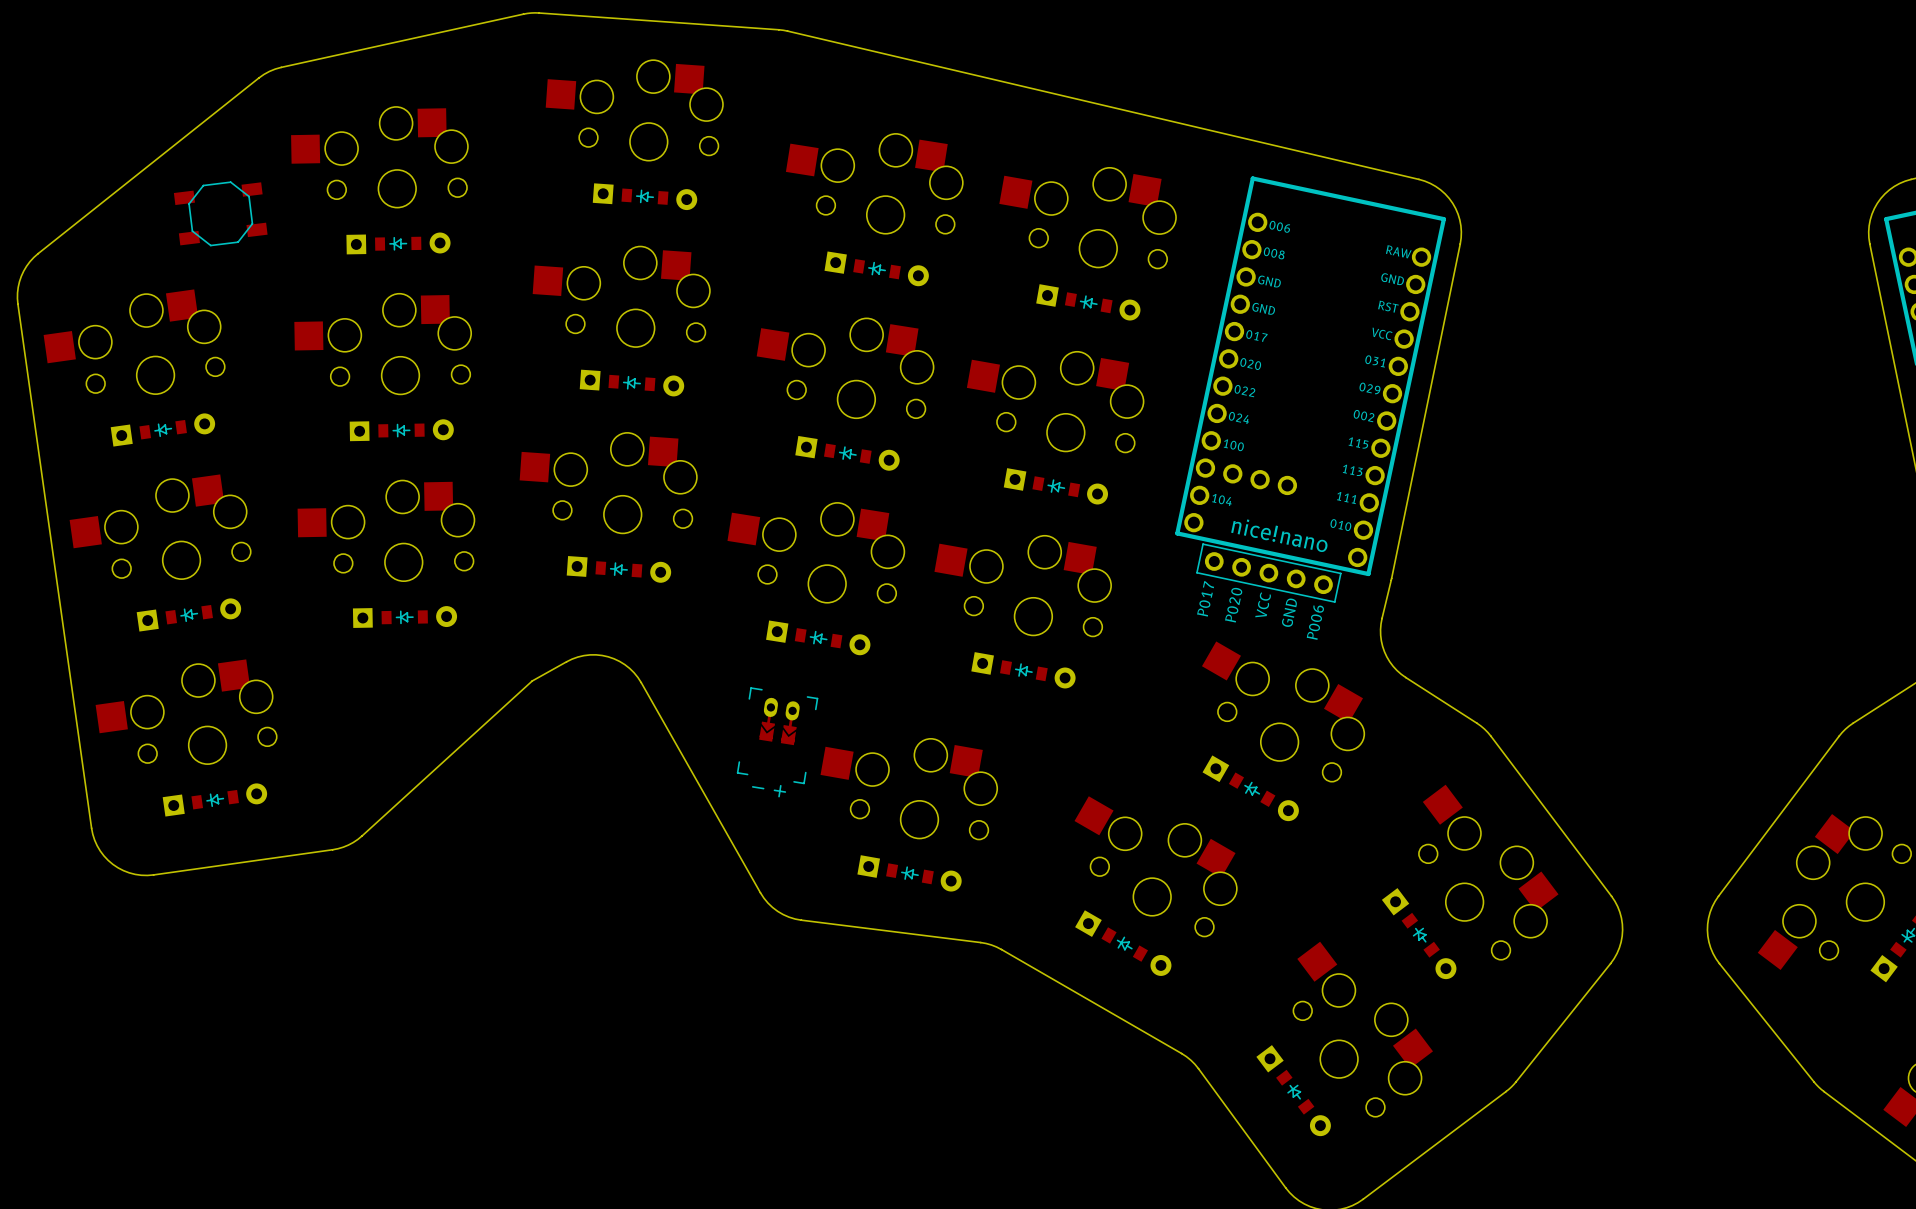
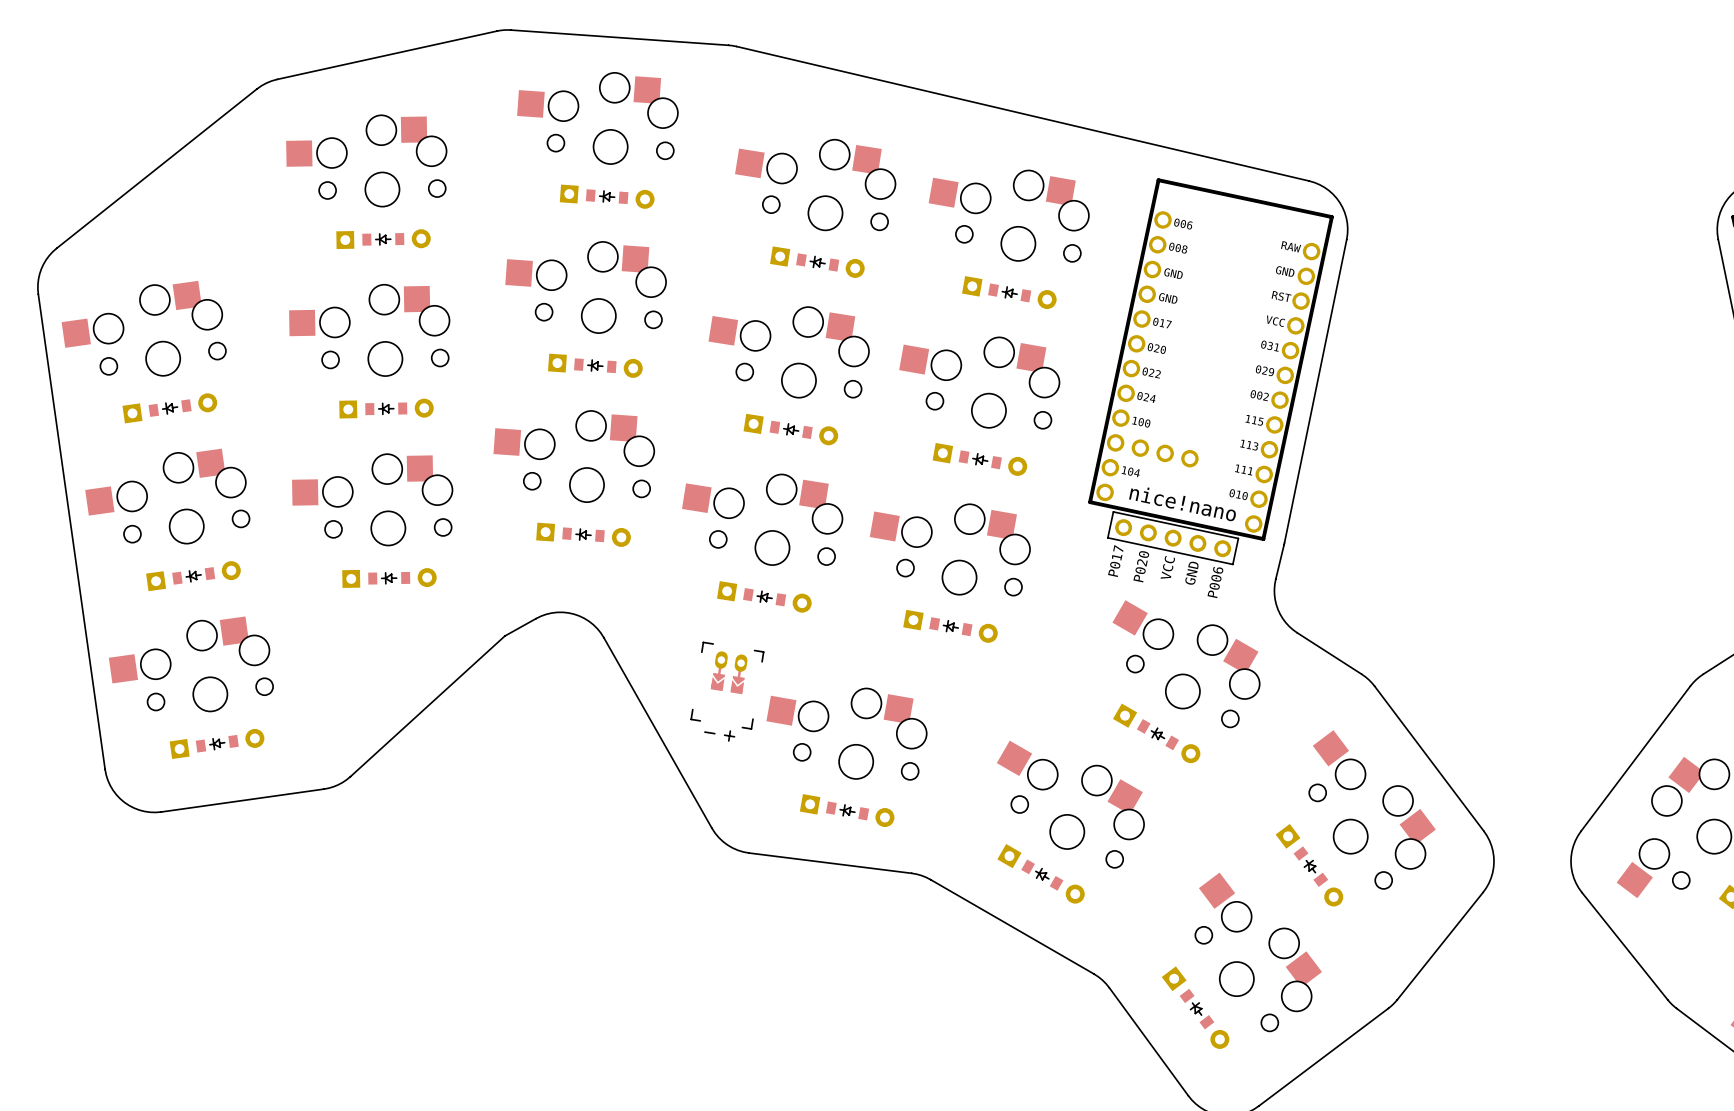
part: (220, 213) -> none

